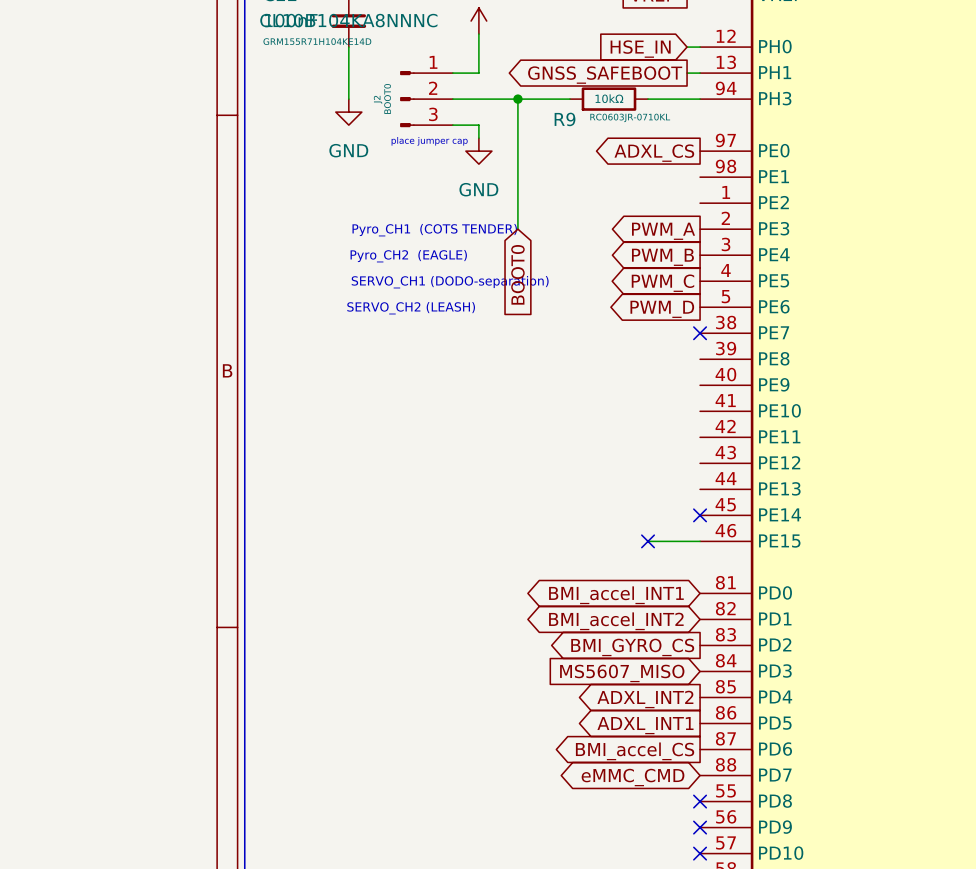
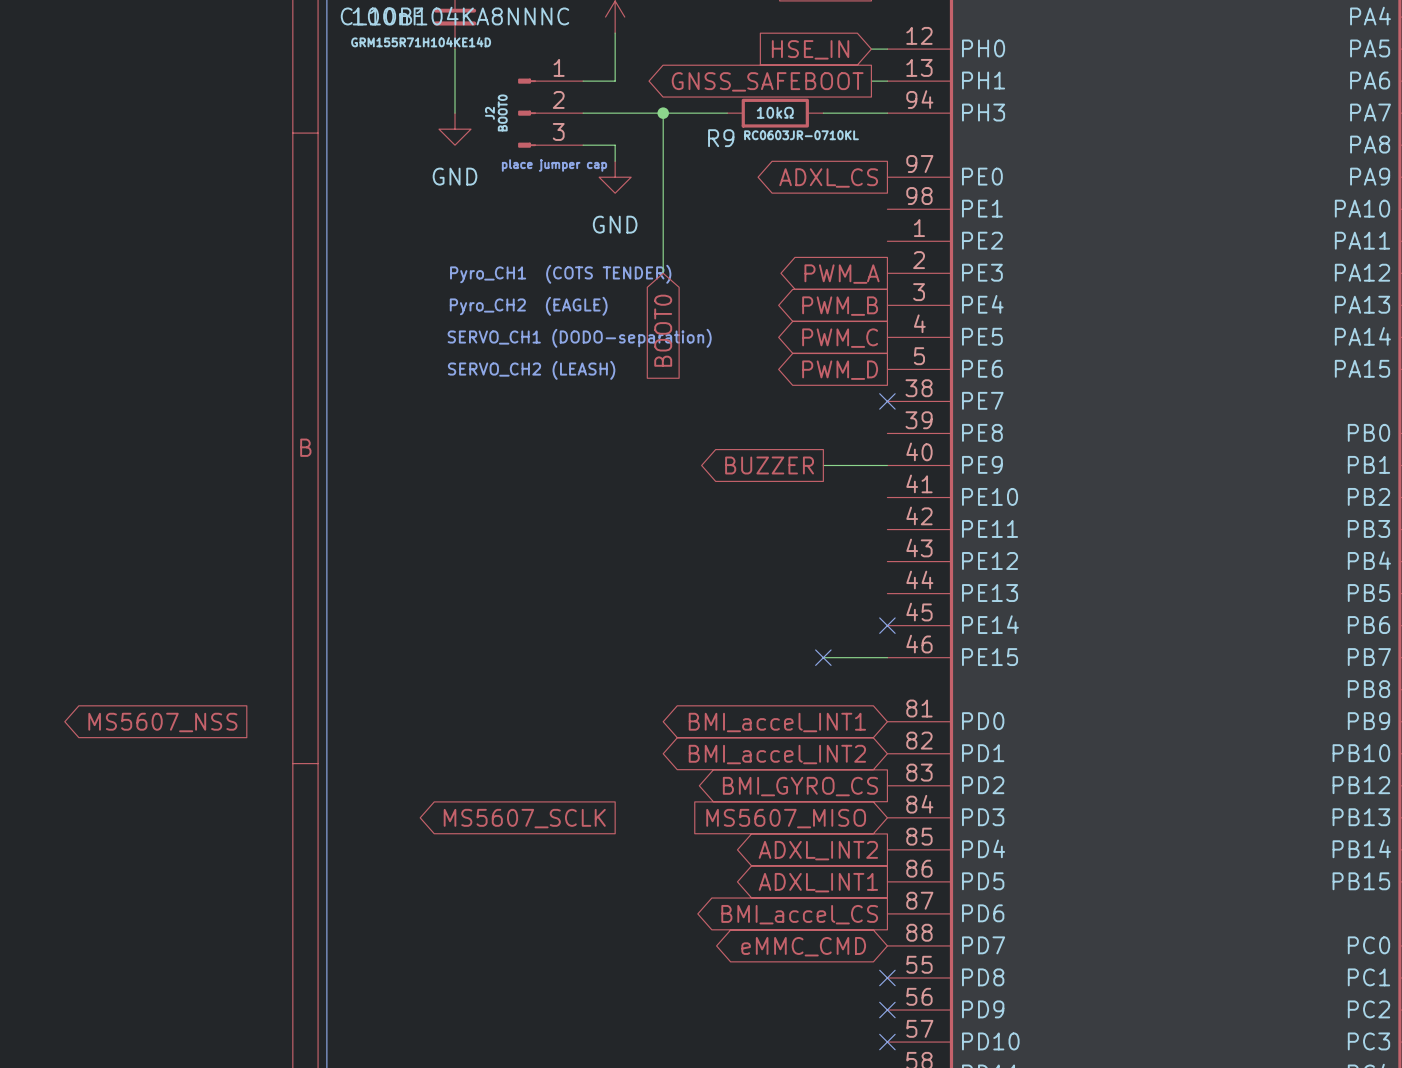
global label: none -> BUZZER (769, 465)
wire: none -> (823, 465) (887, 465)
global label: none -> MS5607_NSS (162, 722)
global label: none -> MS5607_SCLK (524, 818)

